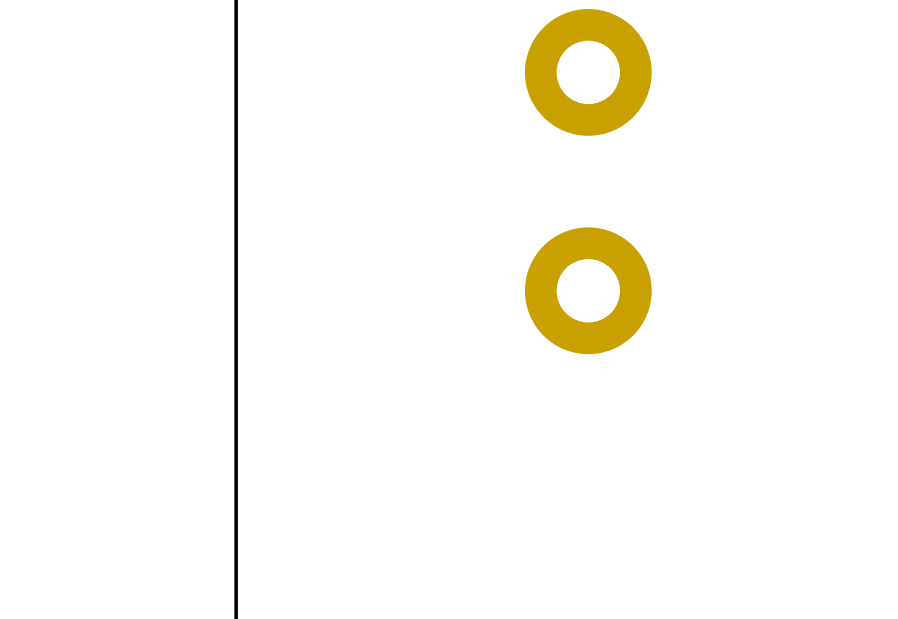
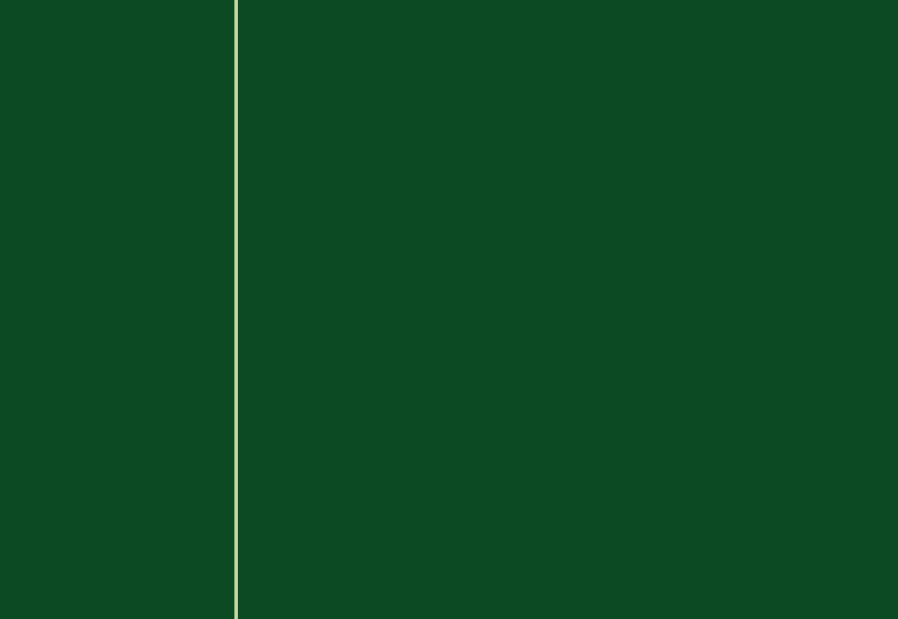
part: (588, 72) -> none
part: (588, 290) -> none

